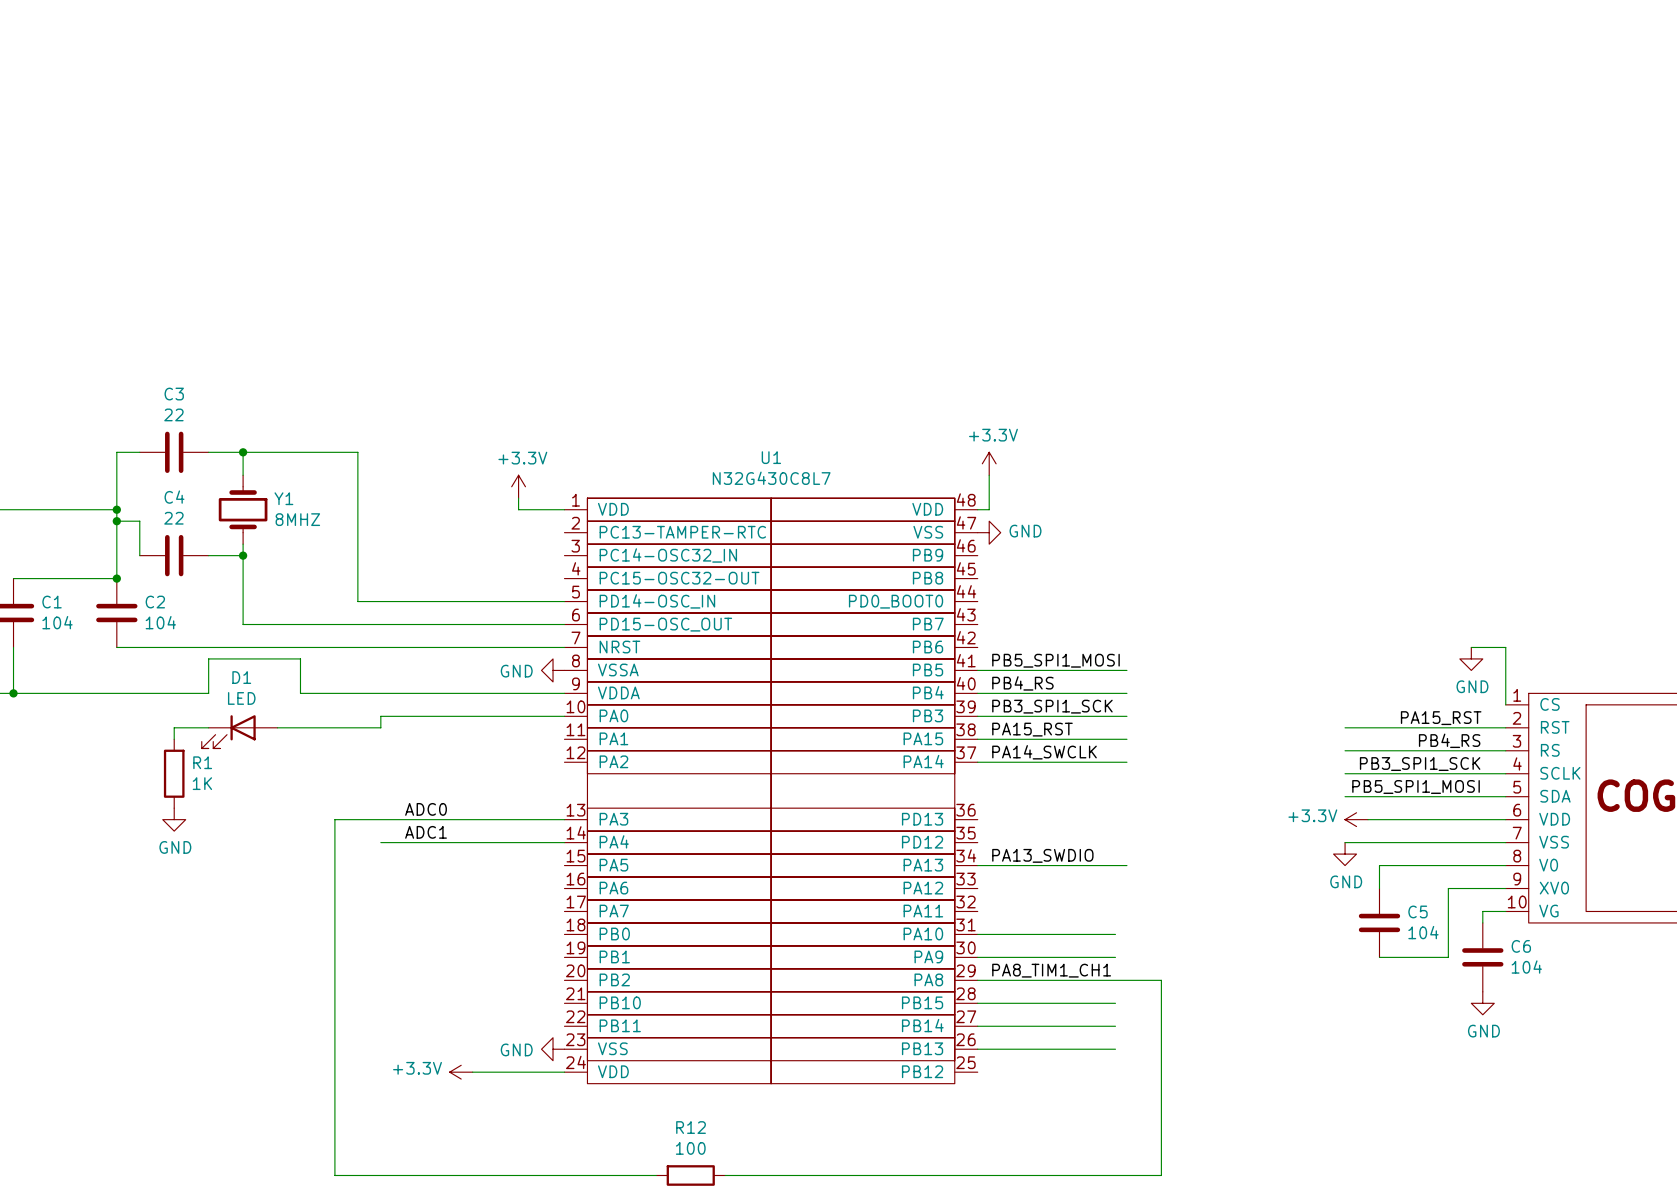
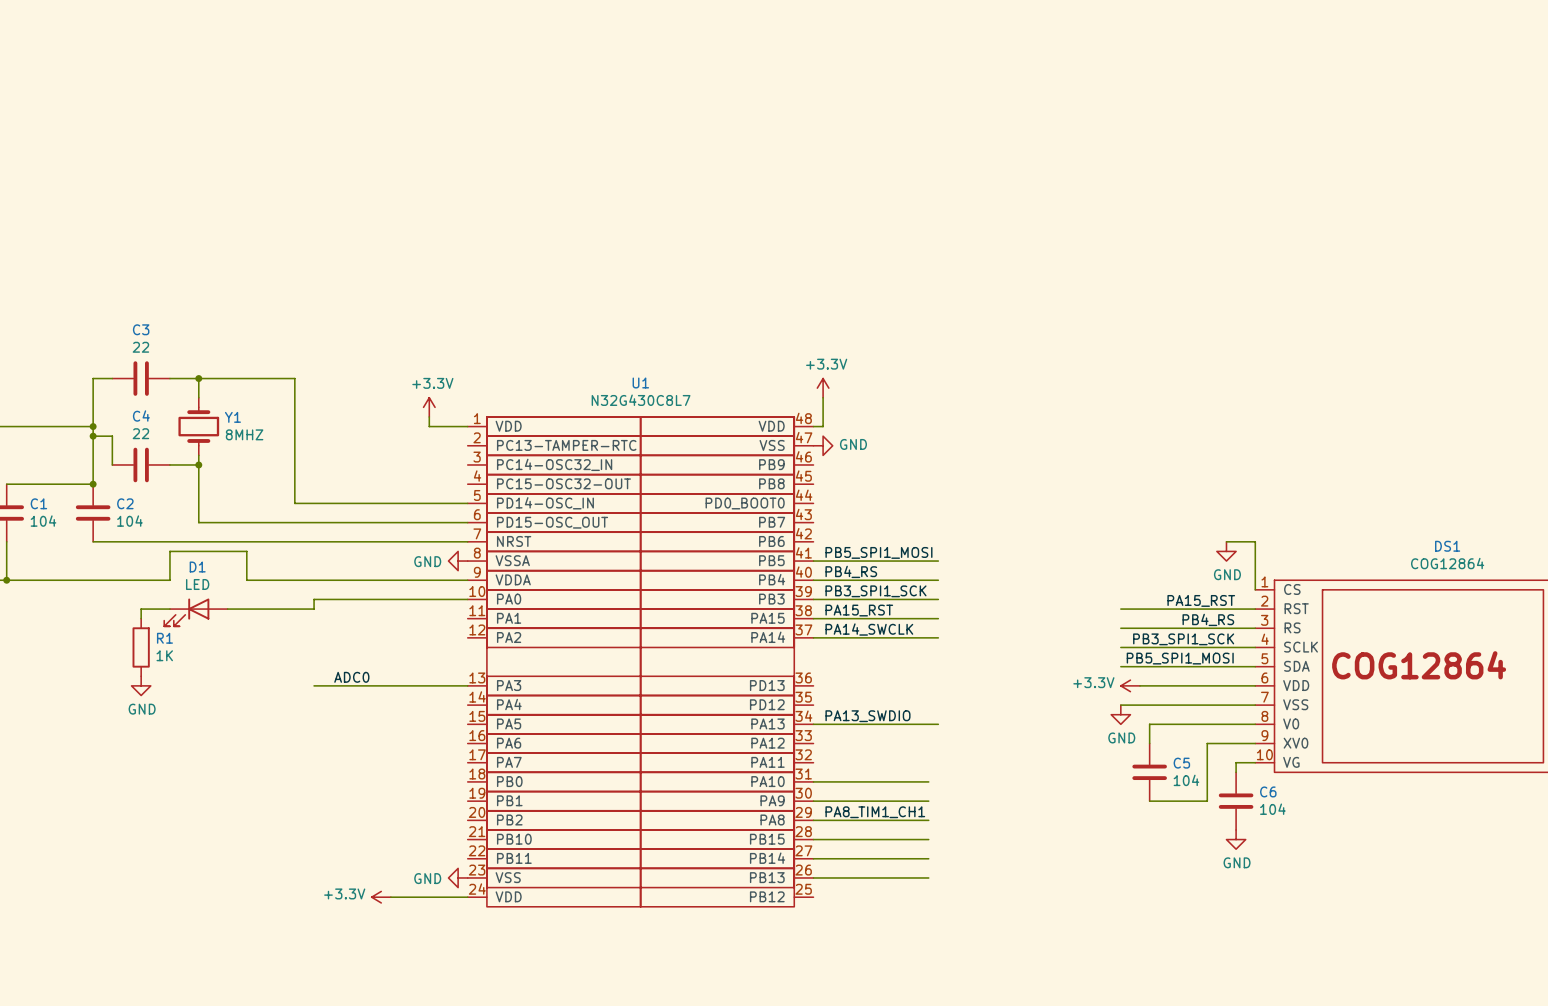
wire: (380, 819) (334, 819) (334, 1175) (656, 1175) -> none
label: ADC1 (426, 832) -> none
wire: (380, 842) (564, 842) -> none
wire: (1115, 980) (1161, 980) (1161, 1175) (725, 1175) -> none
R12: 100 (690, 1175) -> none

